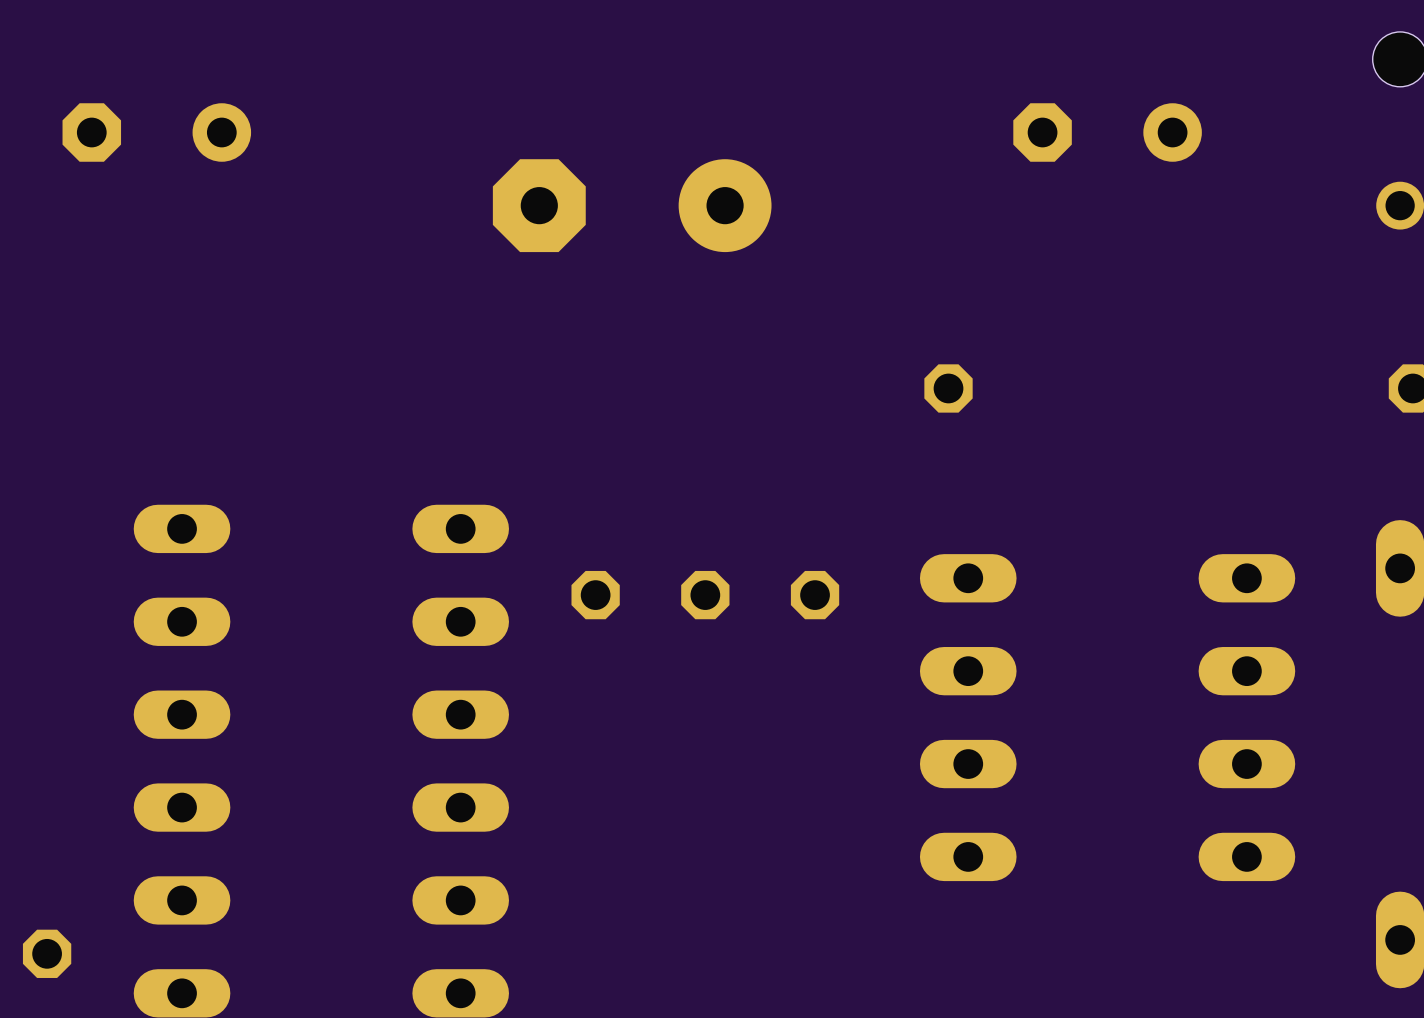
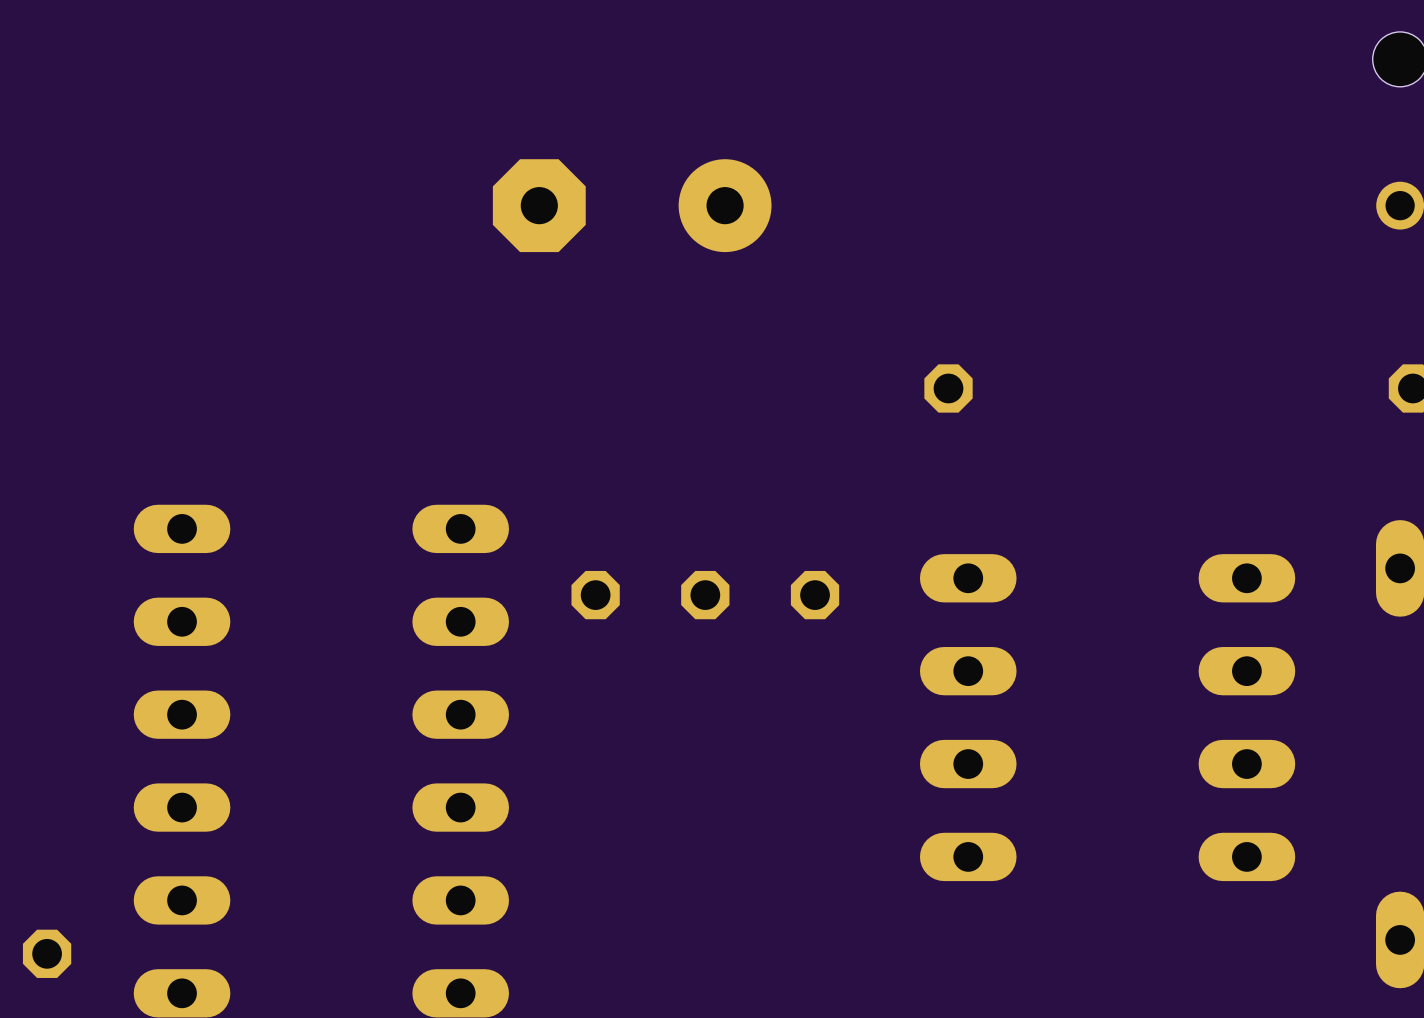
part: (156, 132) -> none
part: (1107, 132) -> none

